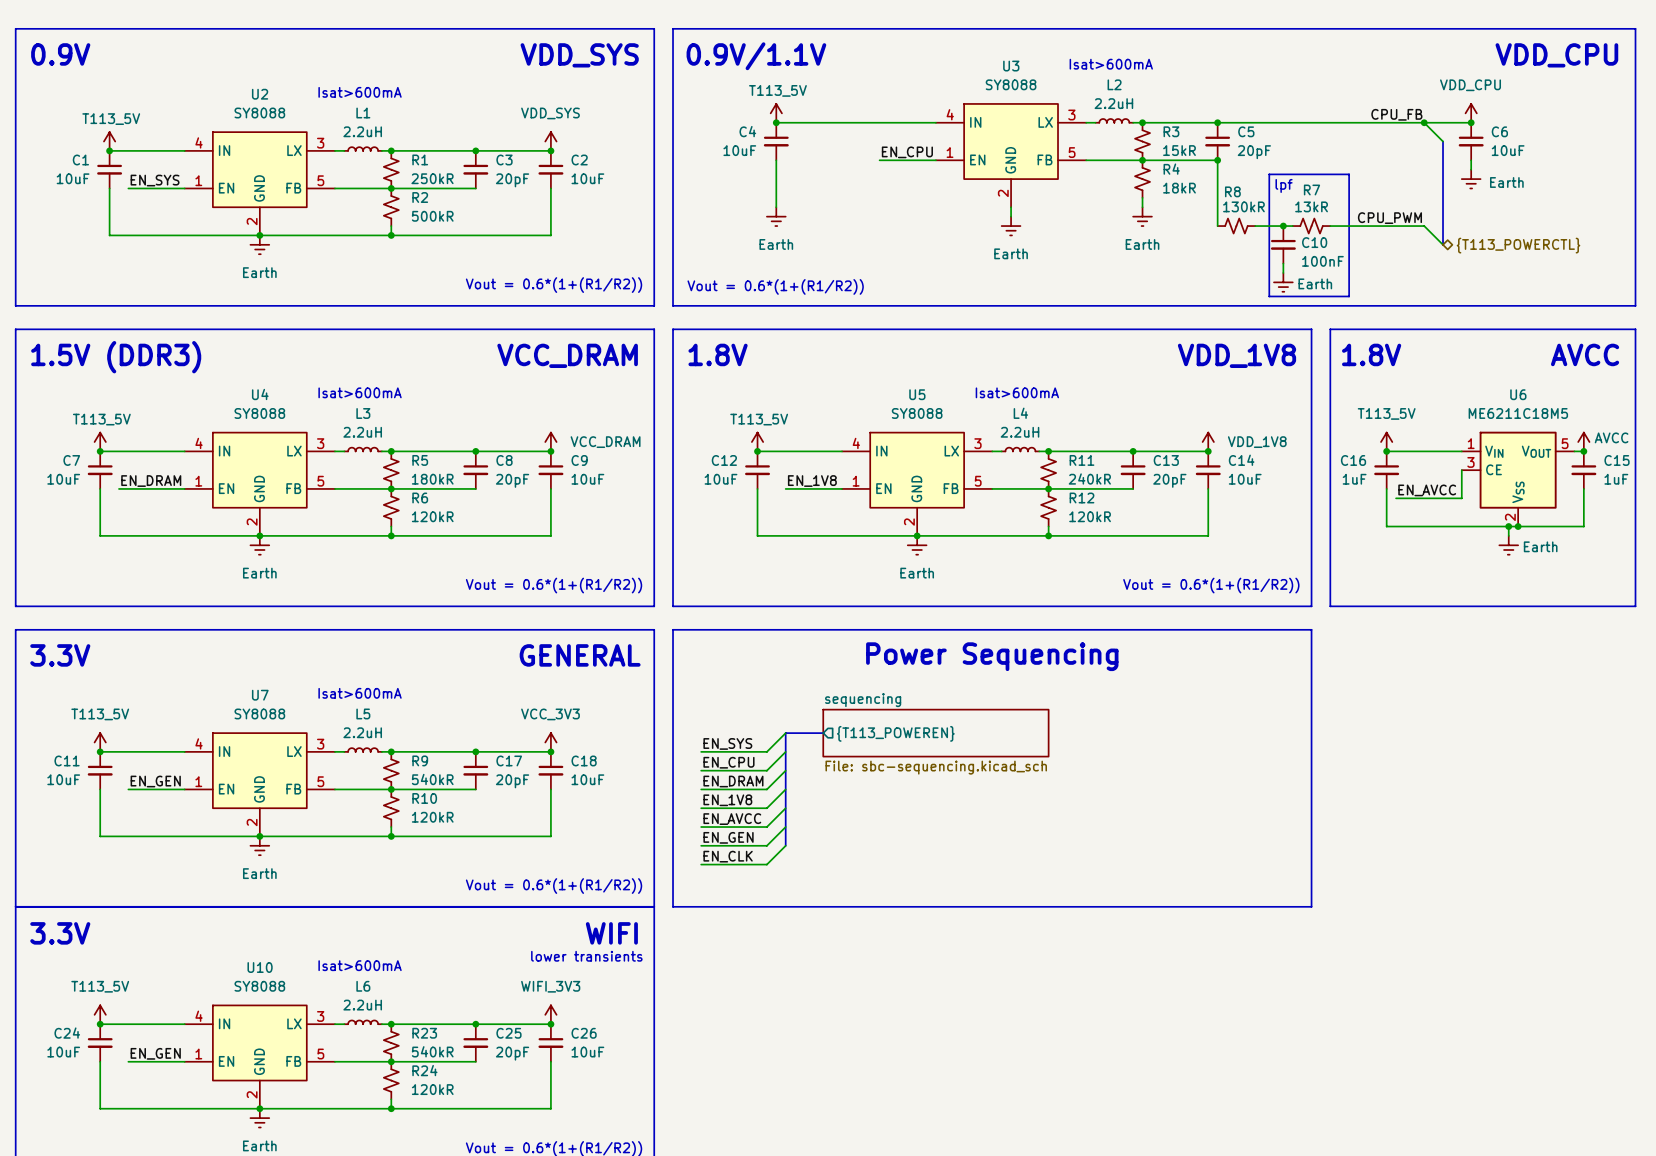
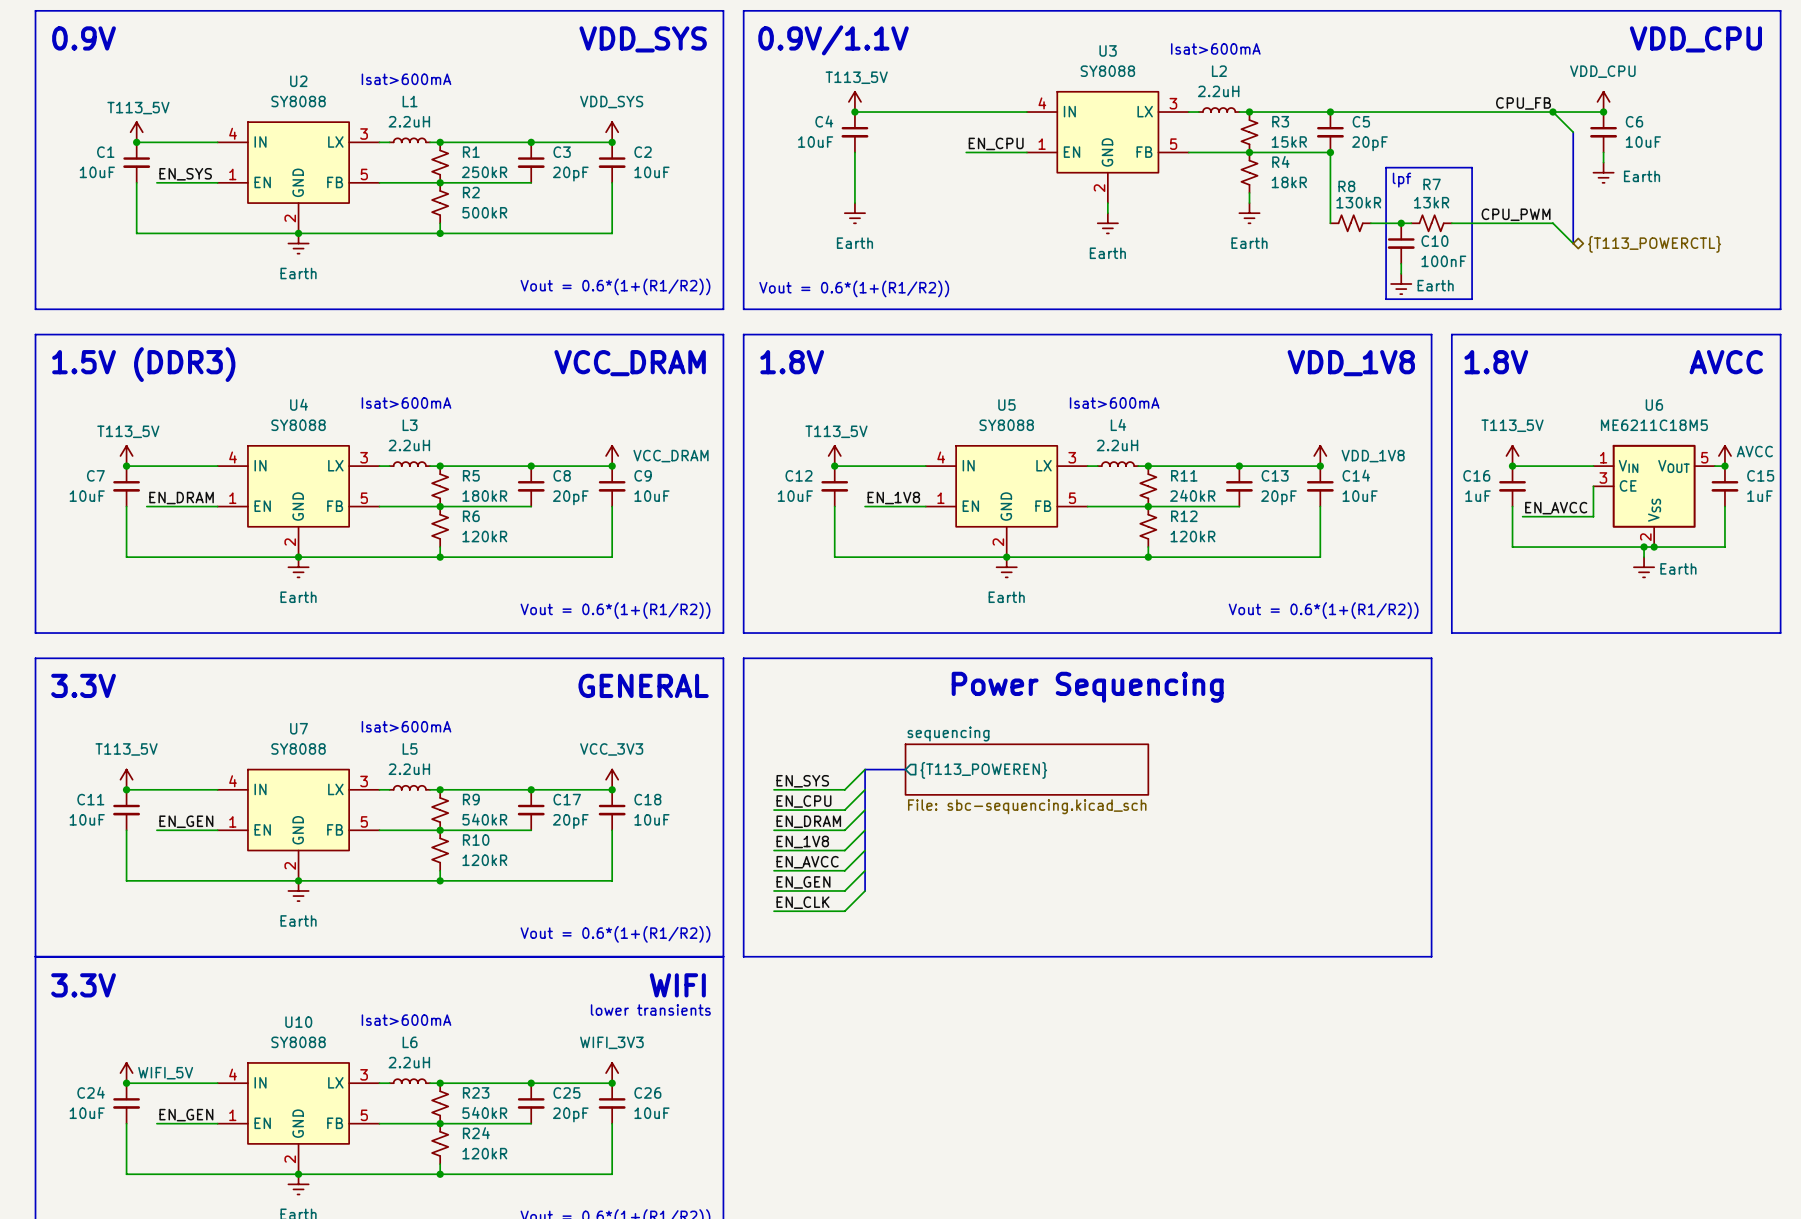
power symbol: T113_5V (100, 1014) -> WIFI_5V (126, 1073)

